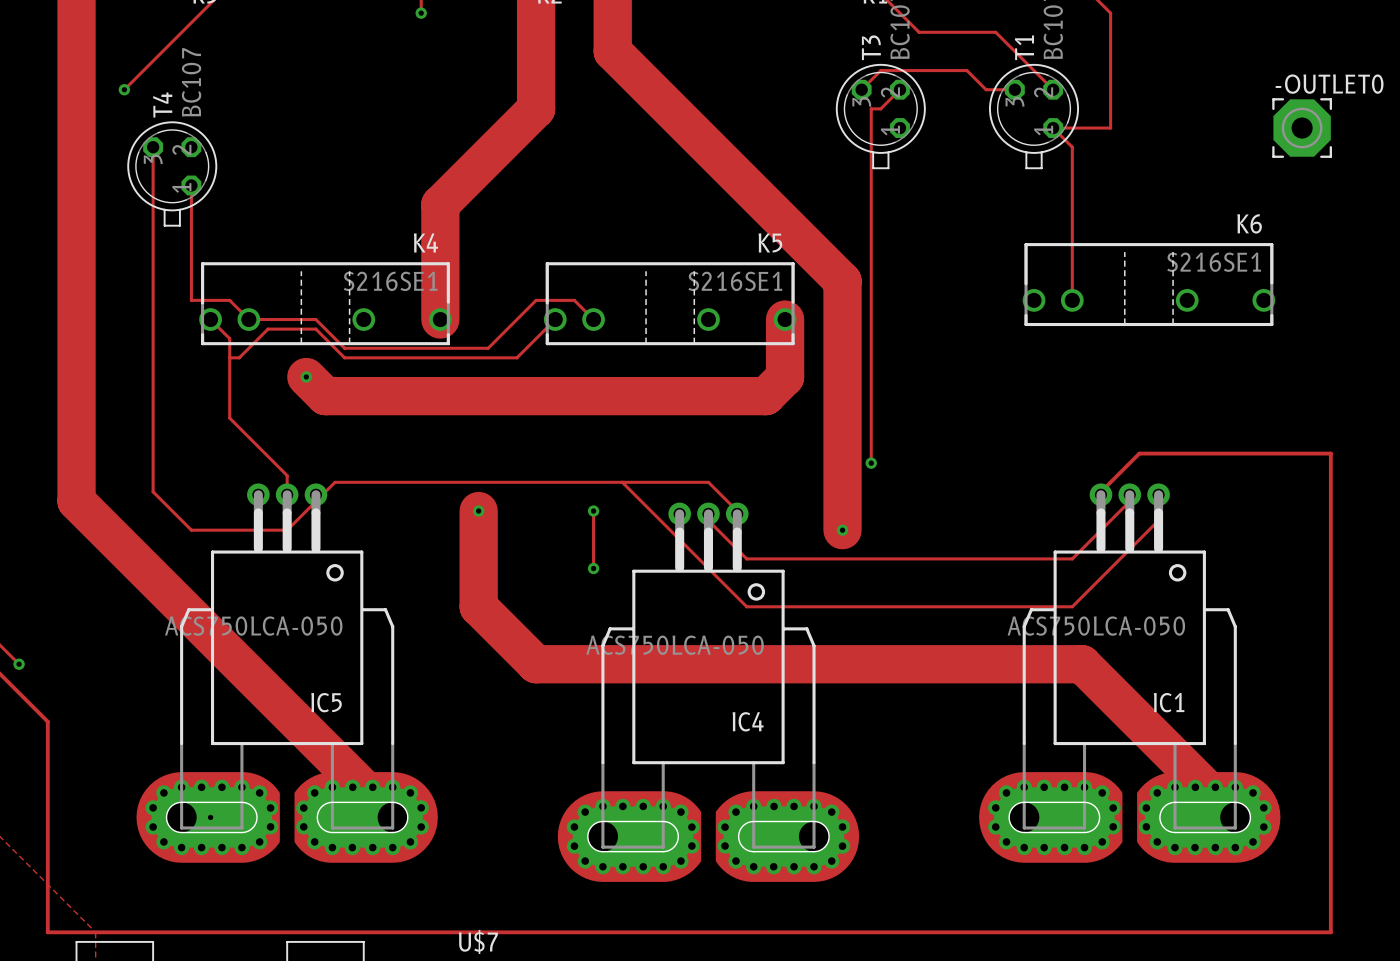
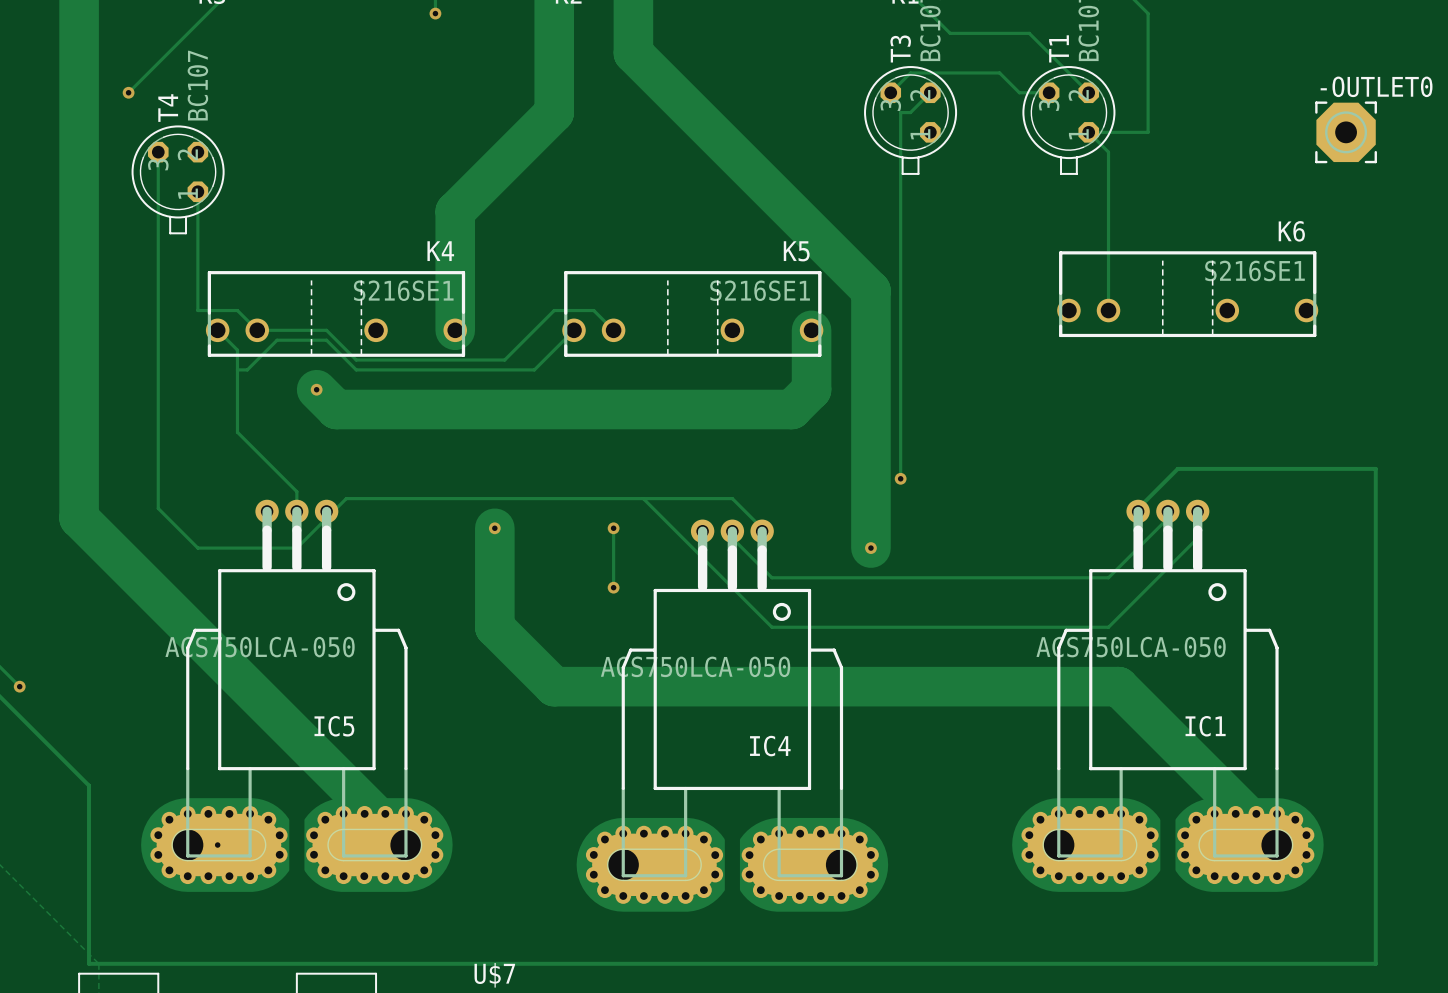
track: (47, 721) (47, 932) (86, 932) -> (49, 746) (89, 785) (89, 963)

